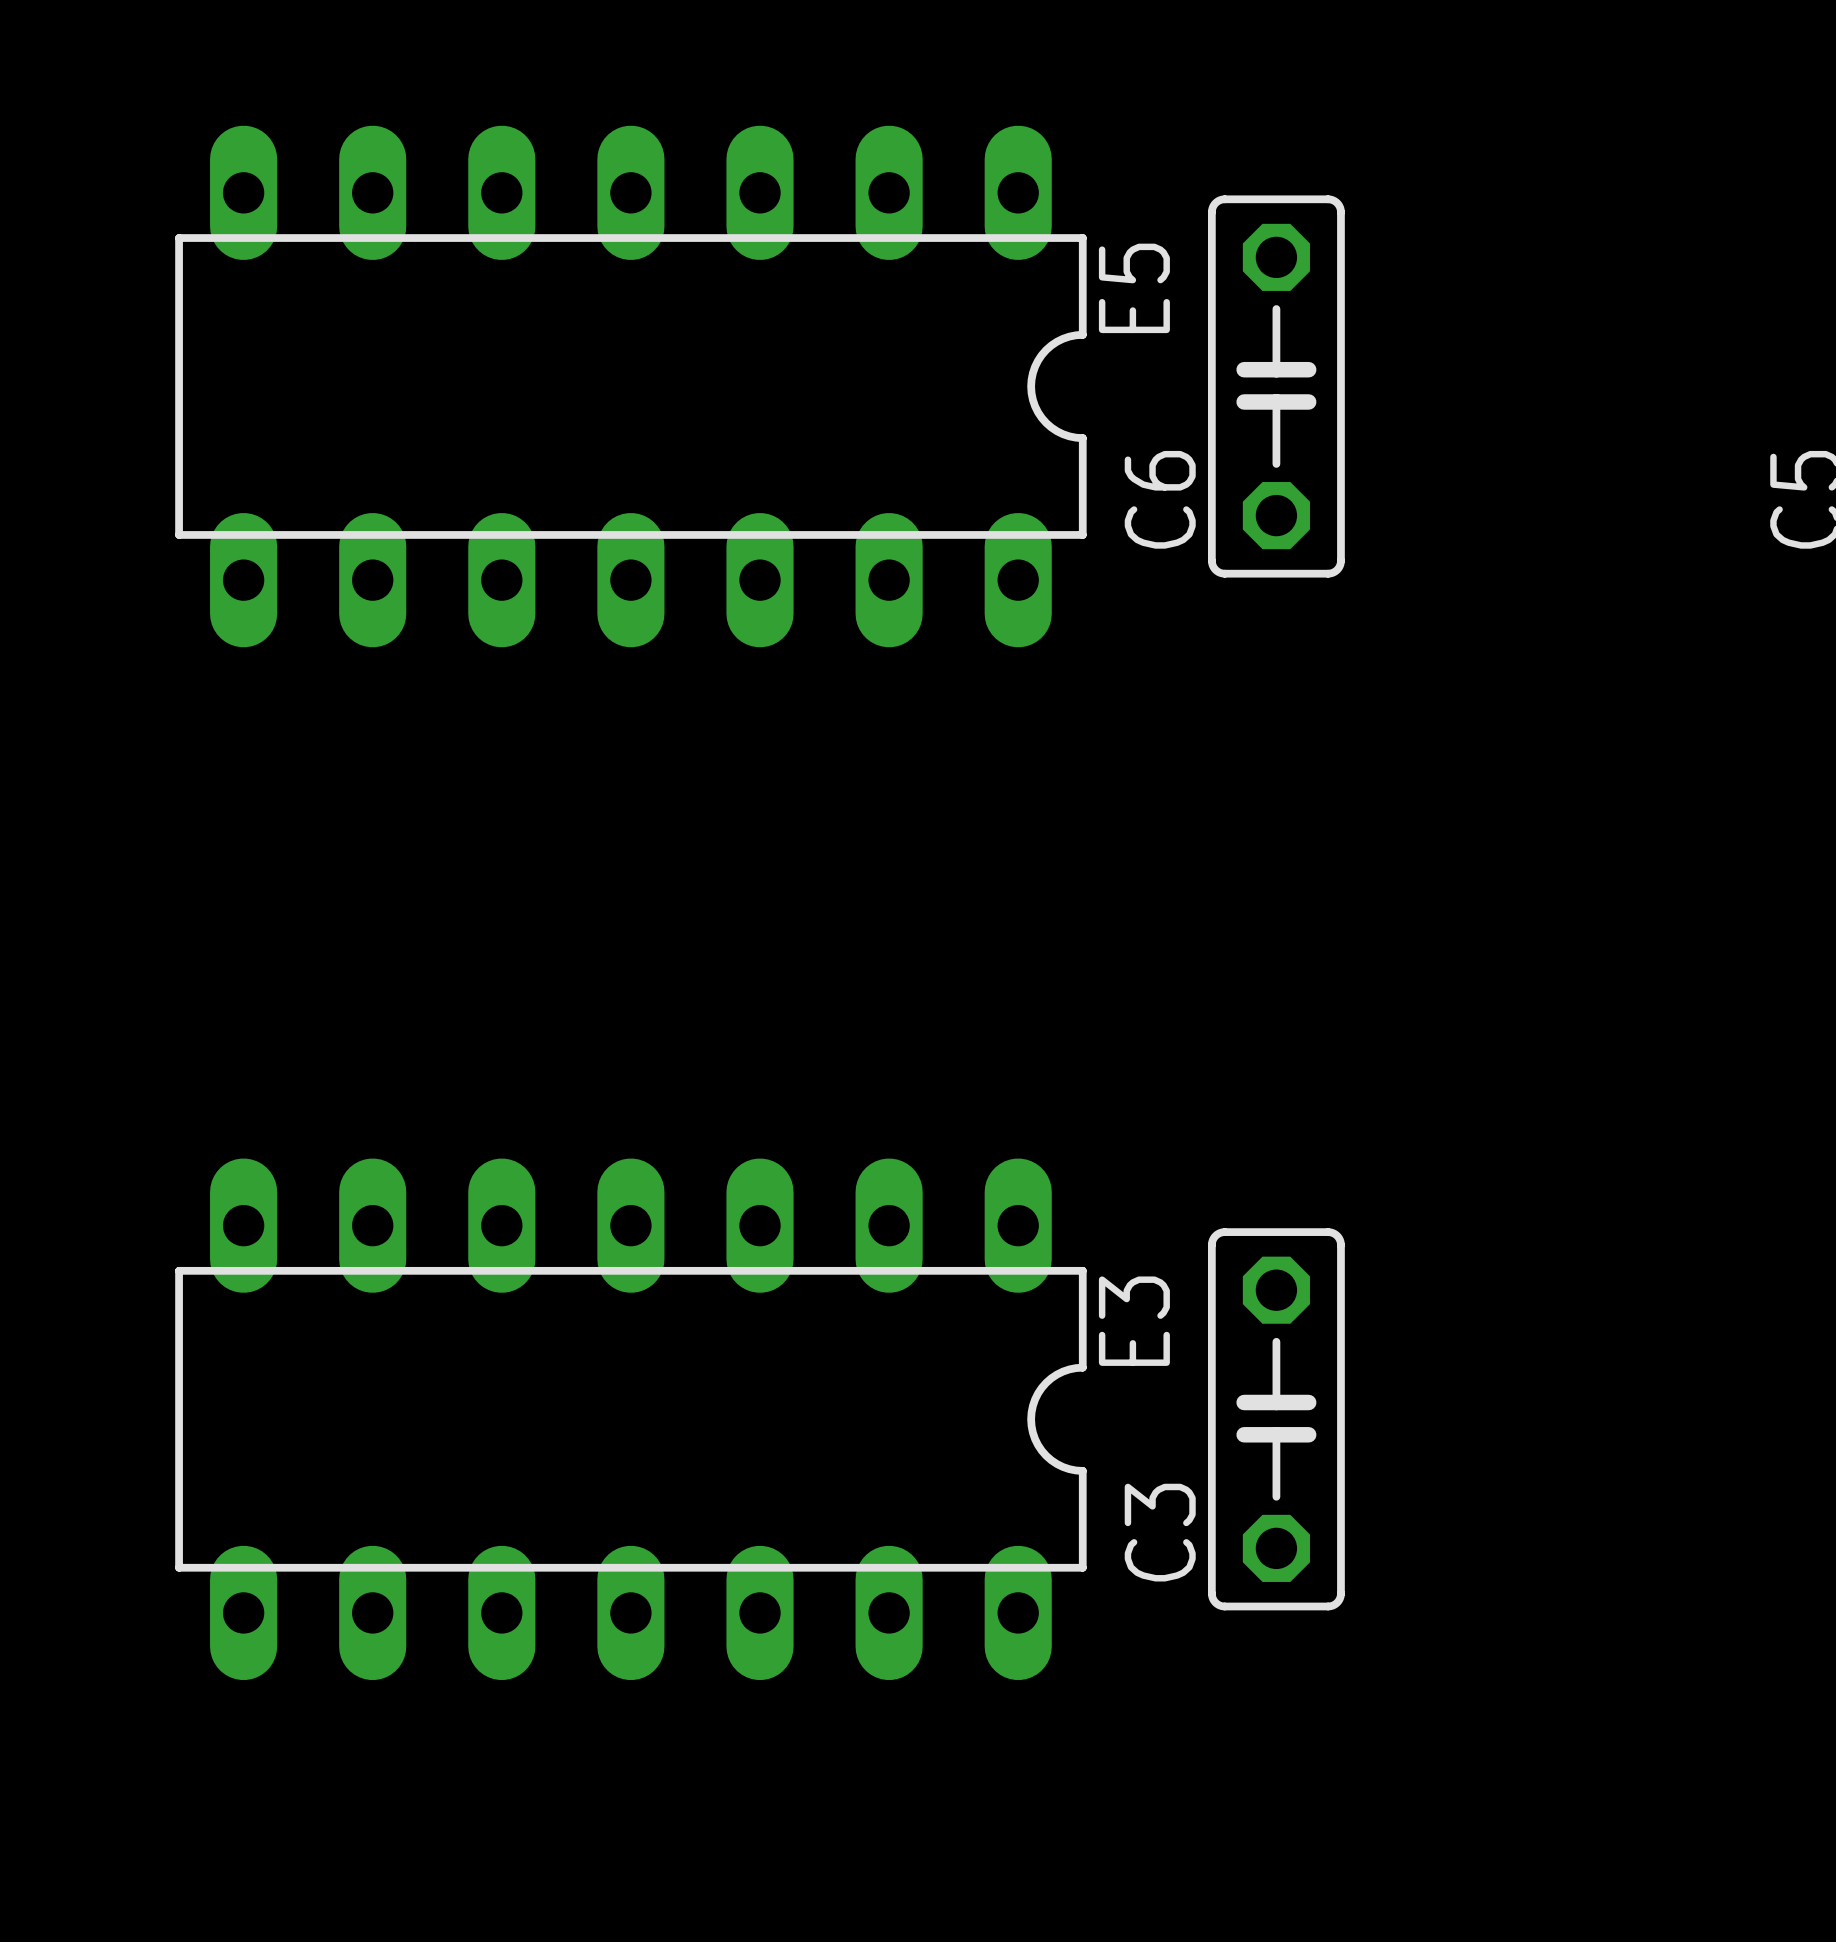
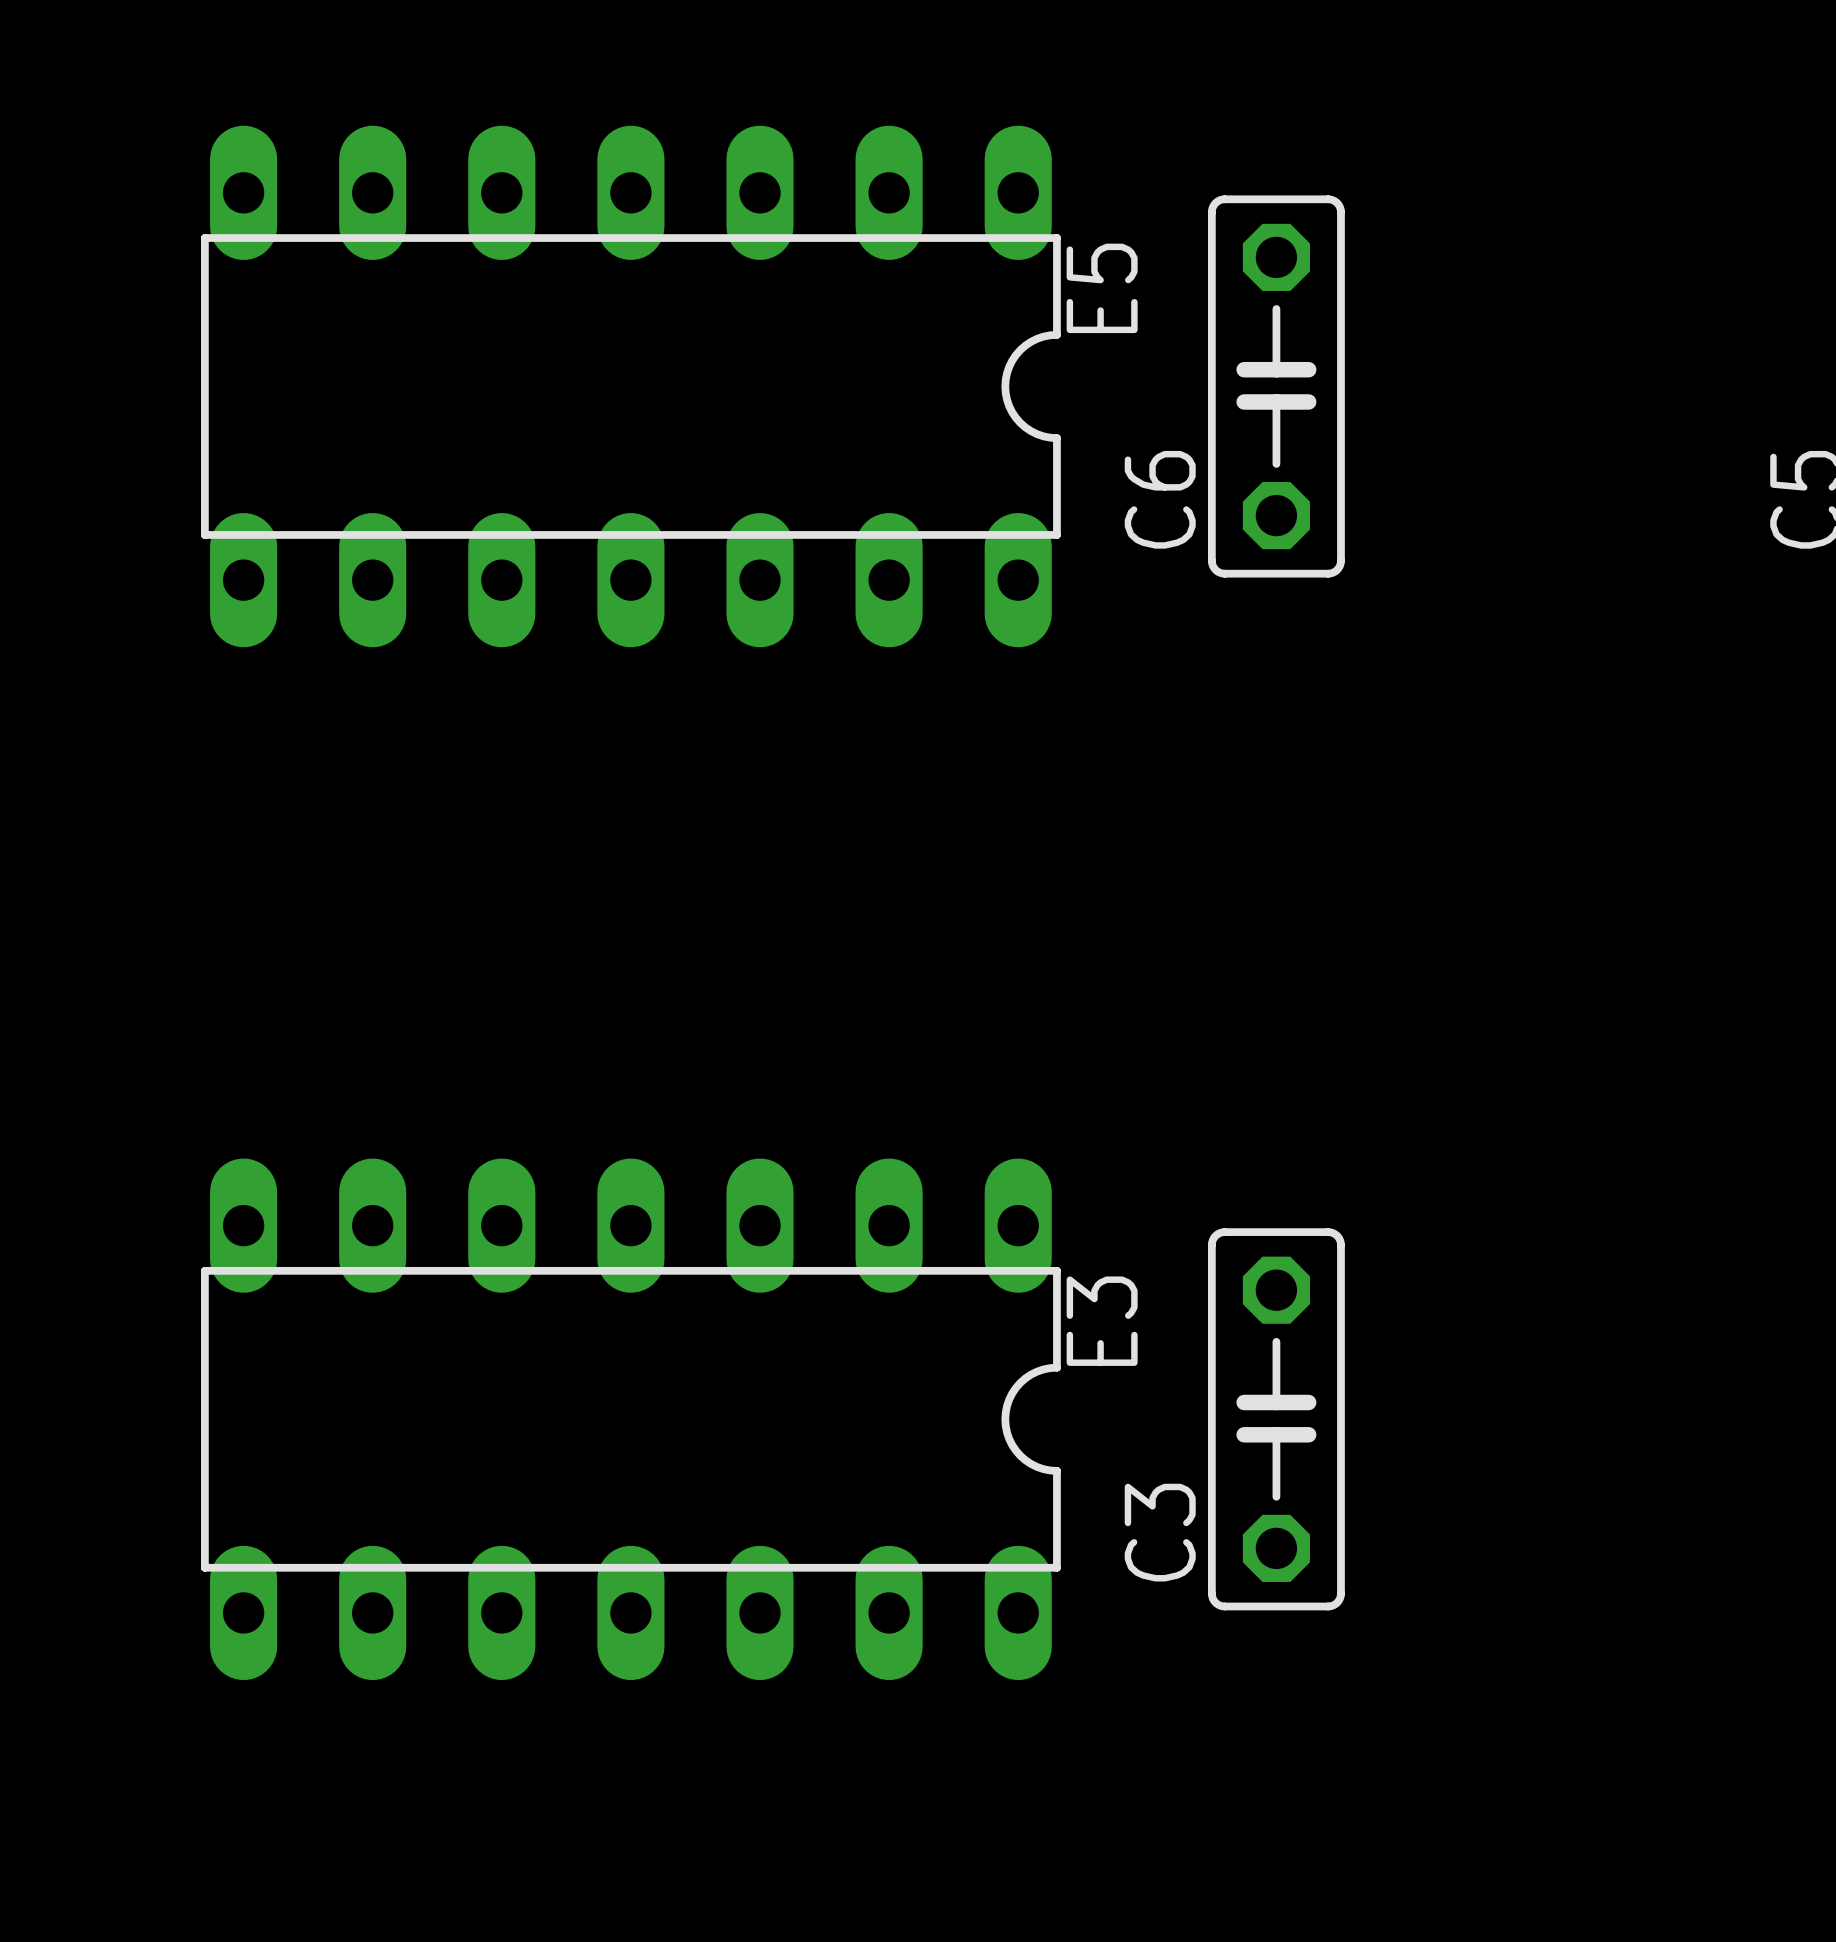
E5 footprint: [175, 125, 1087, 648] -> [201, 125, 1061, 648]
E5 name position: E5 (1134, 288) -> E5 (1102, 288)
E3 footprint: [175, 1158, 1087, 1681] -> [201, 1158, 1061, 1681]
E3 name position: E3 (1134, 1321) -> E3 (1102, 1321)

